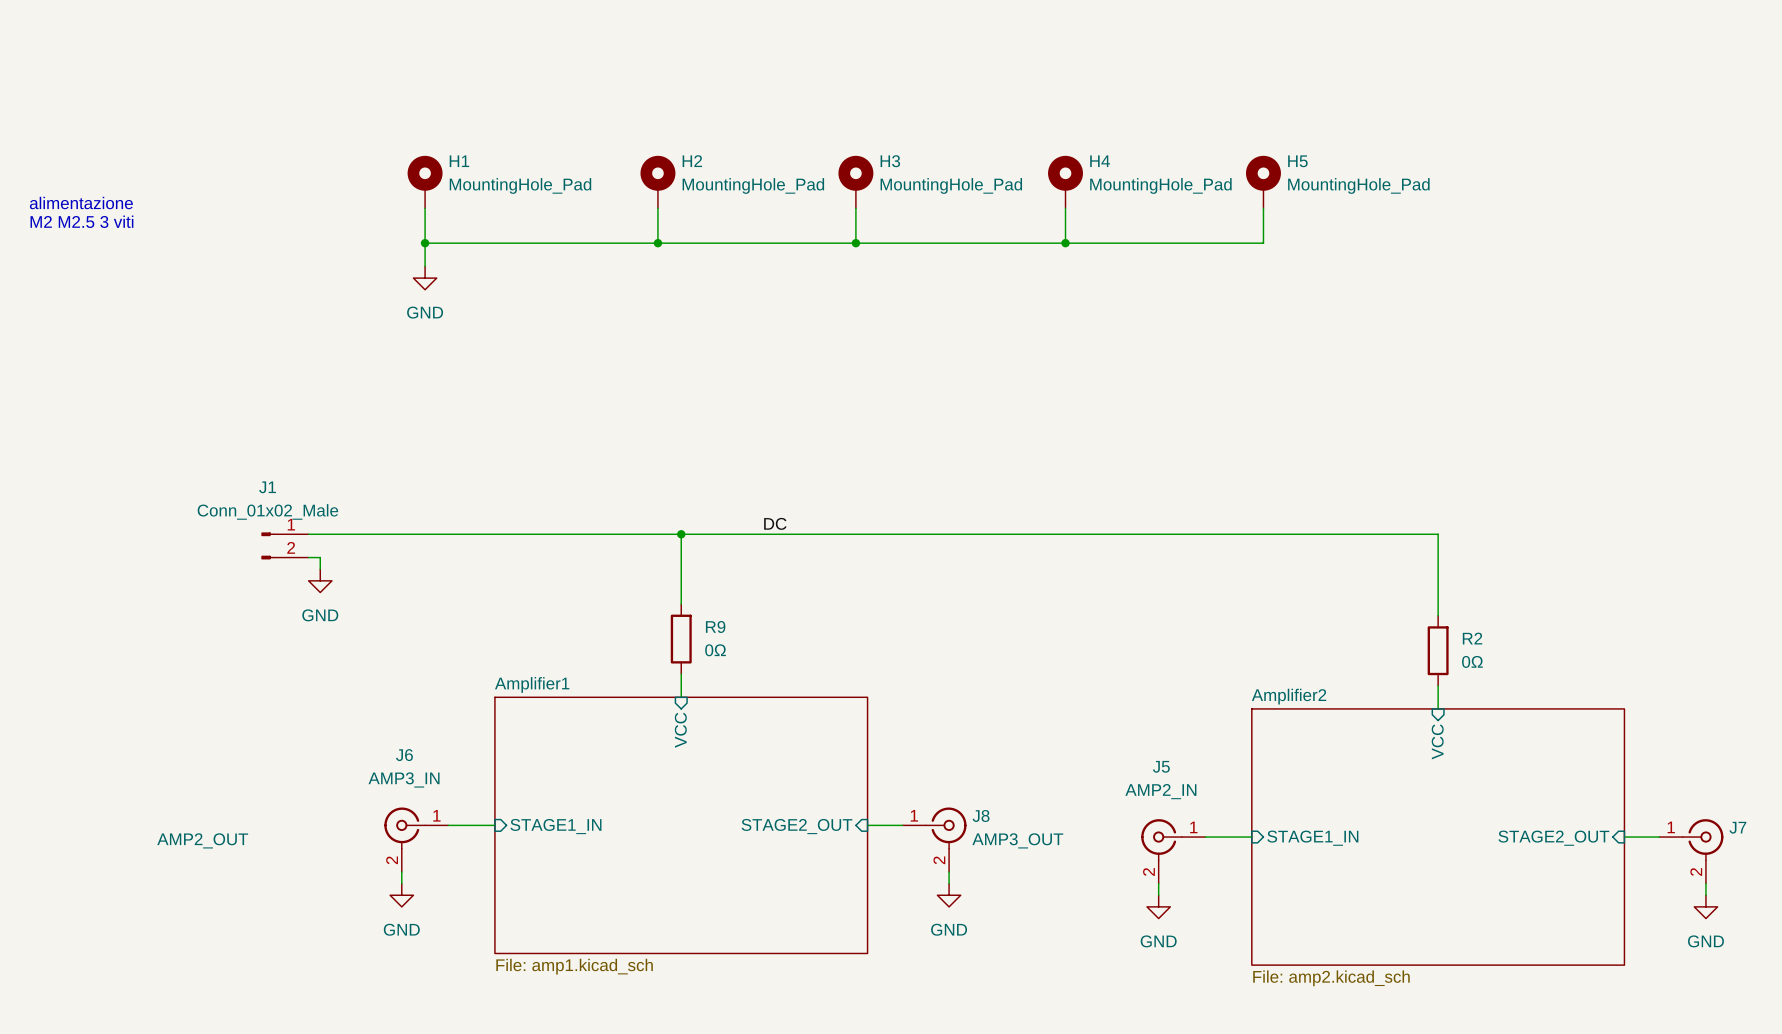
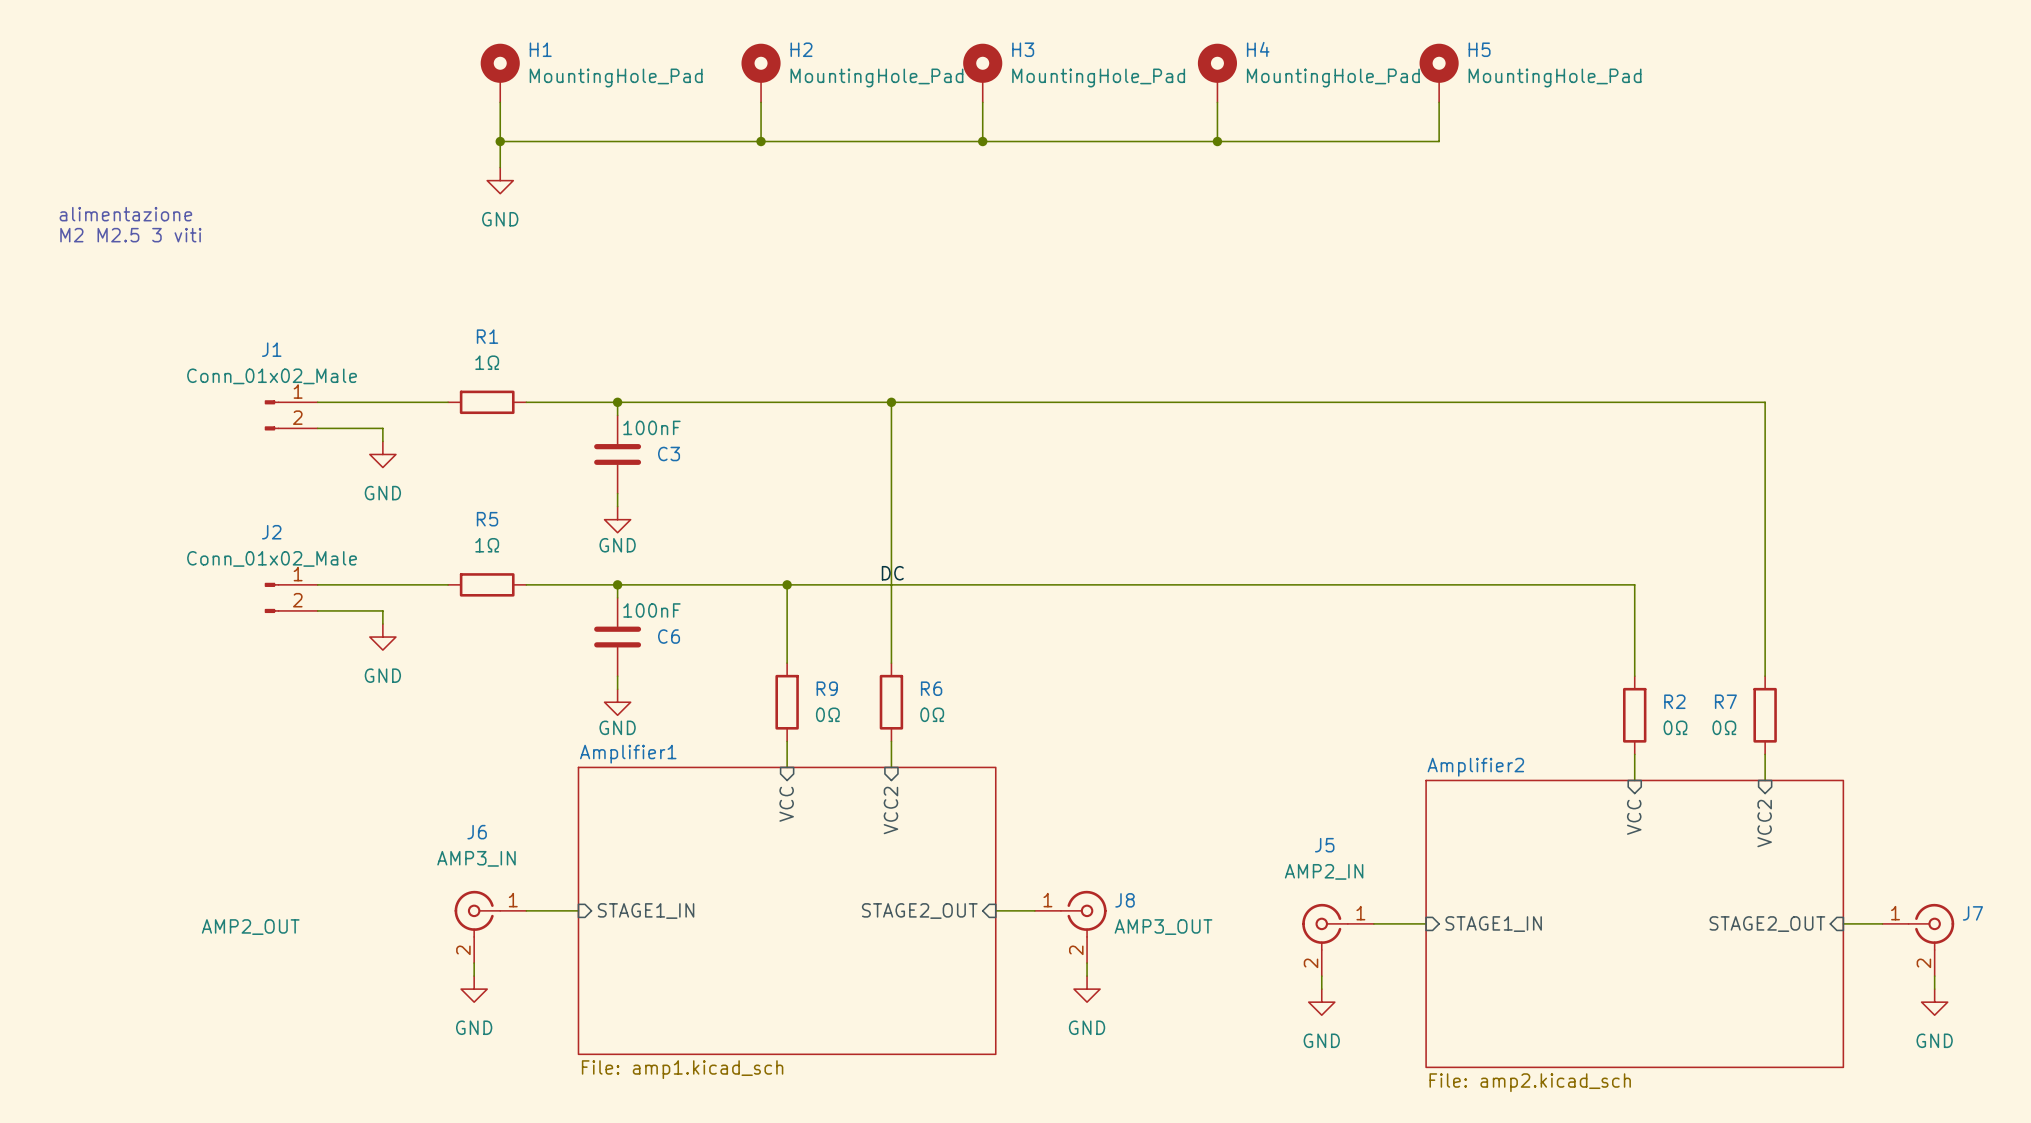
junction: none -> (500, 141)
junction: none -> (761, 141)
junction: none -> (982, 141)
junction: none -> (1217, 141)
power symbol: none -> GND (500, 180)
H1 position: (425, 182) -> (500, 73)
H2 position: (657, 182) -> (761, 73)
H3 position: (855, 182) -> (982, 73)
H4 position: (1065, 182) -> (1217, 73)
H5 position: (1263, 182) -> (1439, 73)
wire: (425, 208) (425, 266) -> (500, 102) (500, 167)
wire: (657, 208) (657, 243) -> (761, 102) (761, 141)
wire: (855, 208) (855, 243) -> (982, 102) (982, 141)
wire: (1065, 208) (1065, 243) -> (1217, 102) (1217, 141)
wire: (1263, 208) (1263, 243) (425, 243) -> (1439, 102) (1439, 141) (500, 141)
junction: (425, 243) -> none
junction: (657, 243) -> none
junction: (855, 243) -> none
junction: (1065, 243) -> none
power symbol: GND (425, 278) -> none
wire: none -> (317, 402) (448, 402)
R1: none -> 1Ω (487, 402)
wire: none -> (526, 402) (1765, 402) (1765, 676)
wire: none -> (617, 402) (617, 415)
junction: none -> (617, 402)
wire: none -> (891, 402) (891, 663)
junction: none -> (891, 402)
wire: none -> (317, 428) (382, 428) (382, 441)
power symbol: none -> GND (382, 454)
C3: none -> 100nF (617, 454)
wire: none -> (617, 493) (617, 506)
power symbol: none -> GND (617, 519)
wire: (378, 534) (448, 534) -> none
R5: none -> 1Ω (487, 584)
wire: none -> (617, 584) (617, 597)
junction: none -> (617, 584)
J2: none -> Conn_01x02_Male (291, 597)
J1 position: (284, 545) -> (291, 415)
C6: none -> 100nF (617, 637)
wire: none -> (617, 676) (617, 689)
power symbol: none -> GND (617, 702)
R6: none -> 0Ω (891, 702)
R7: none -> 0Ω (1765, 715)
wire: none -> (891, 741) (891, 767)
wire: none -> (1765, 754) (1765, 780)
sheet pin: none -> VCC2 (890, 810)
sheet pin: none -> VCC2 (1764, 823)

